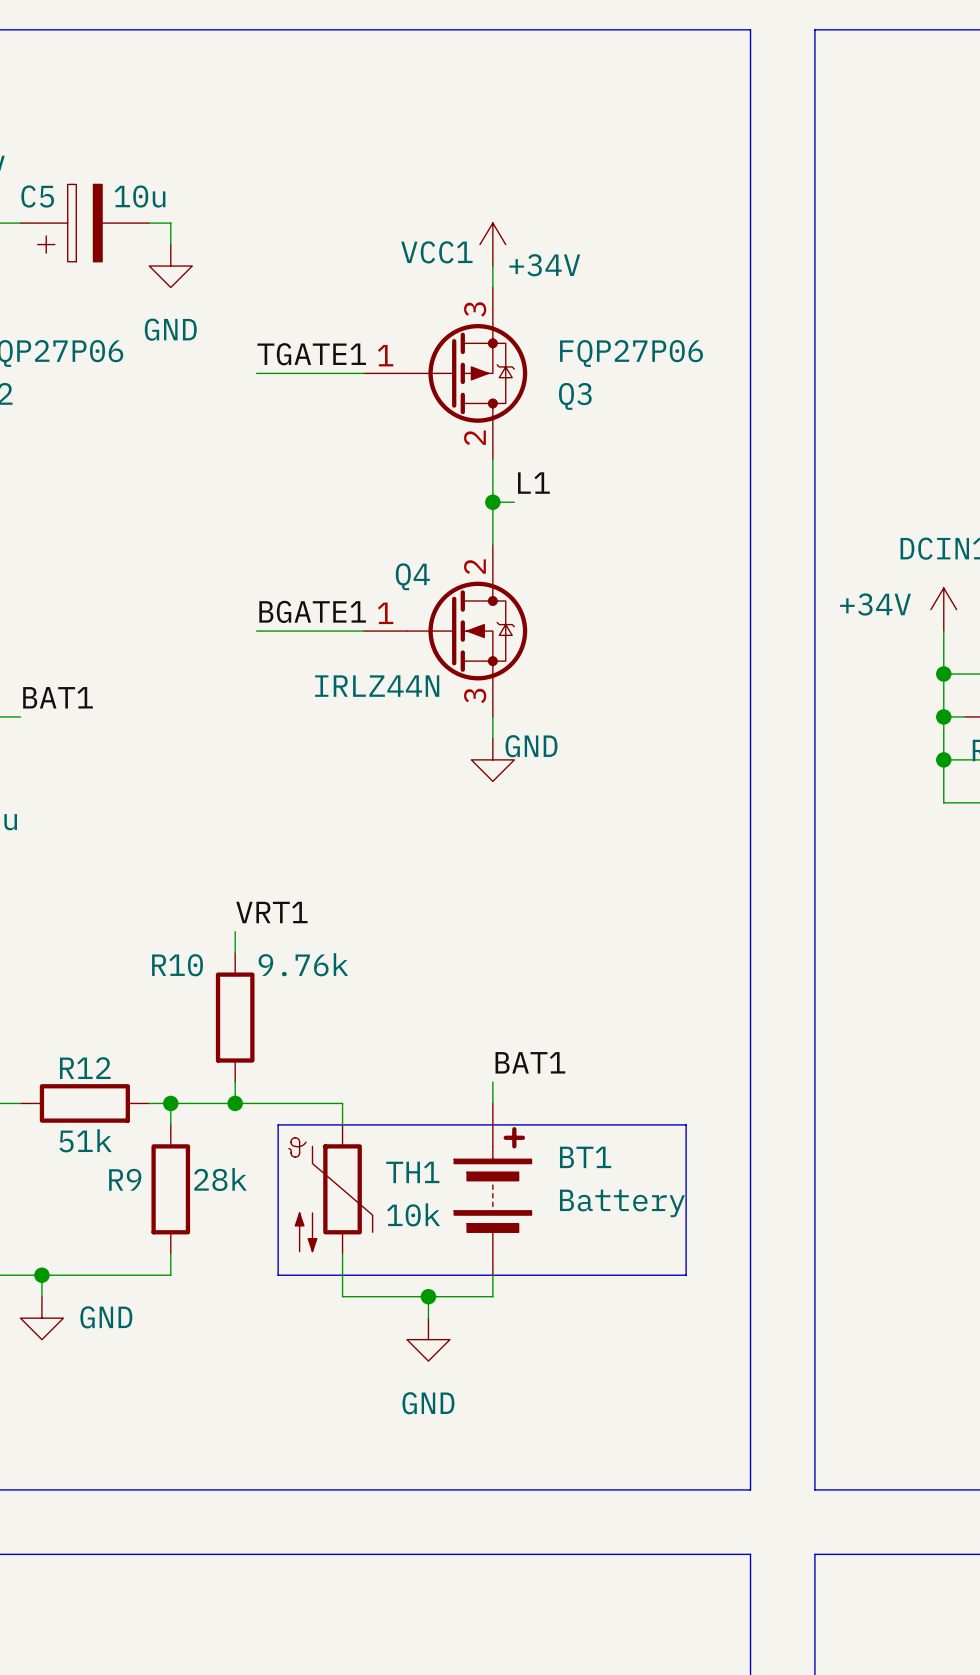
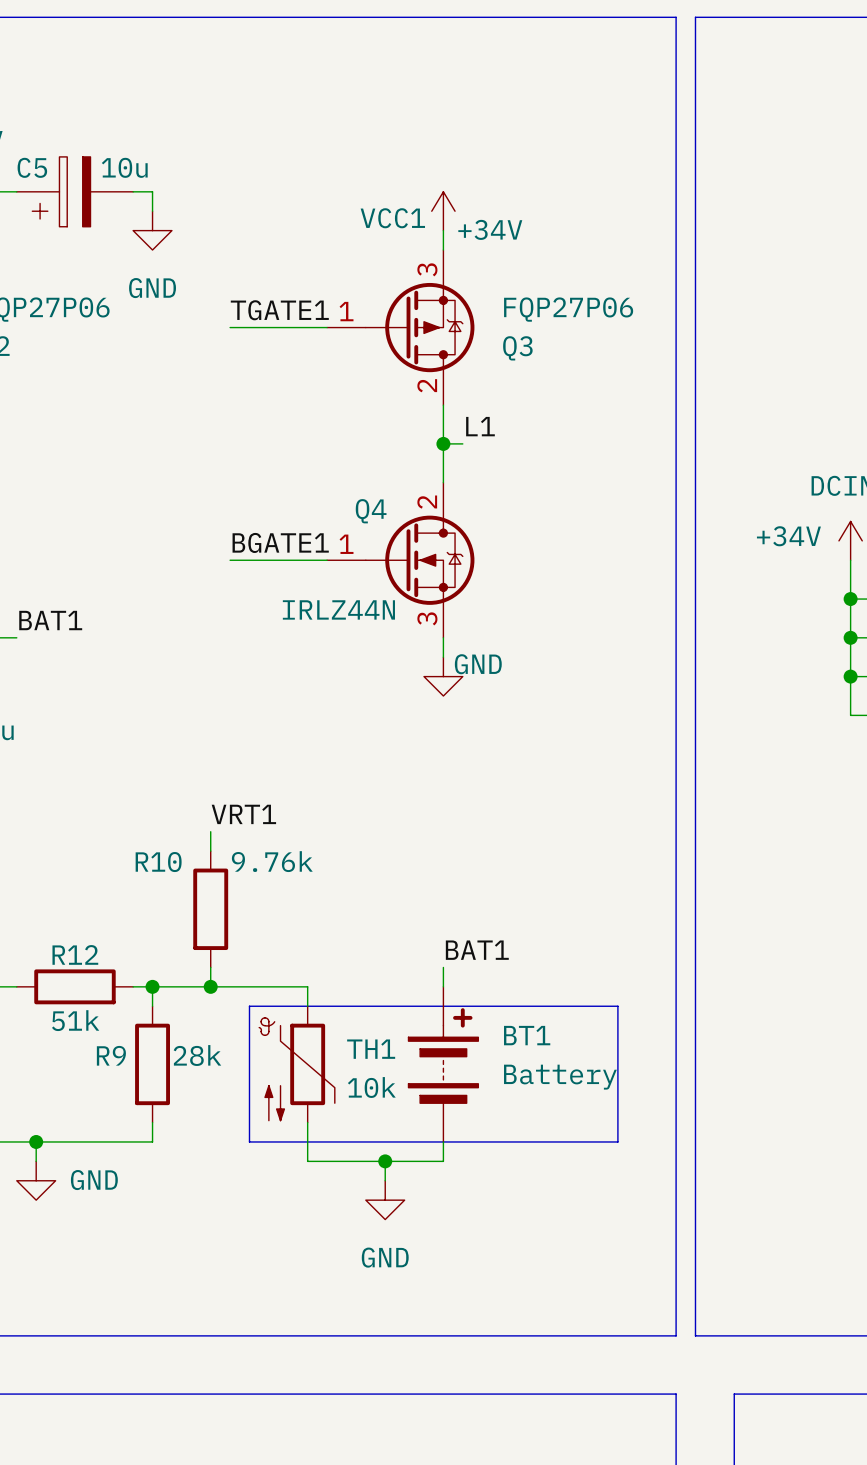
line: (814, 29) (814, 1489) -> (734, 17) (695, 17) (695, 1335) (734, 1335)

